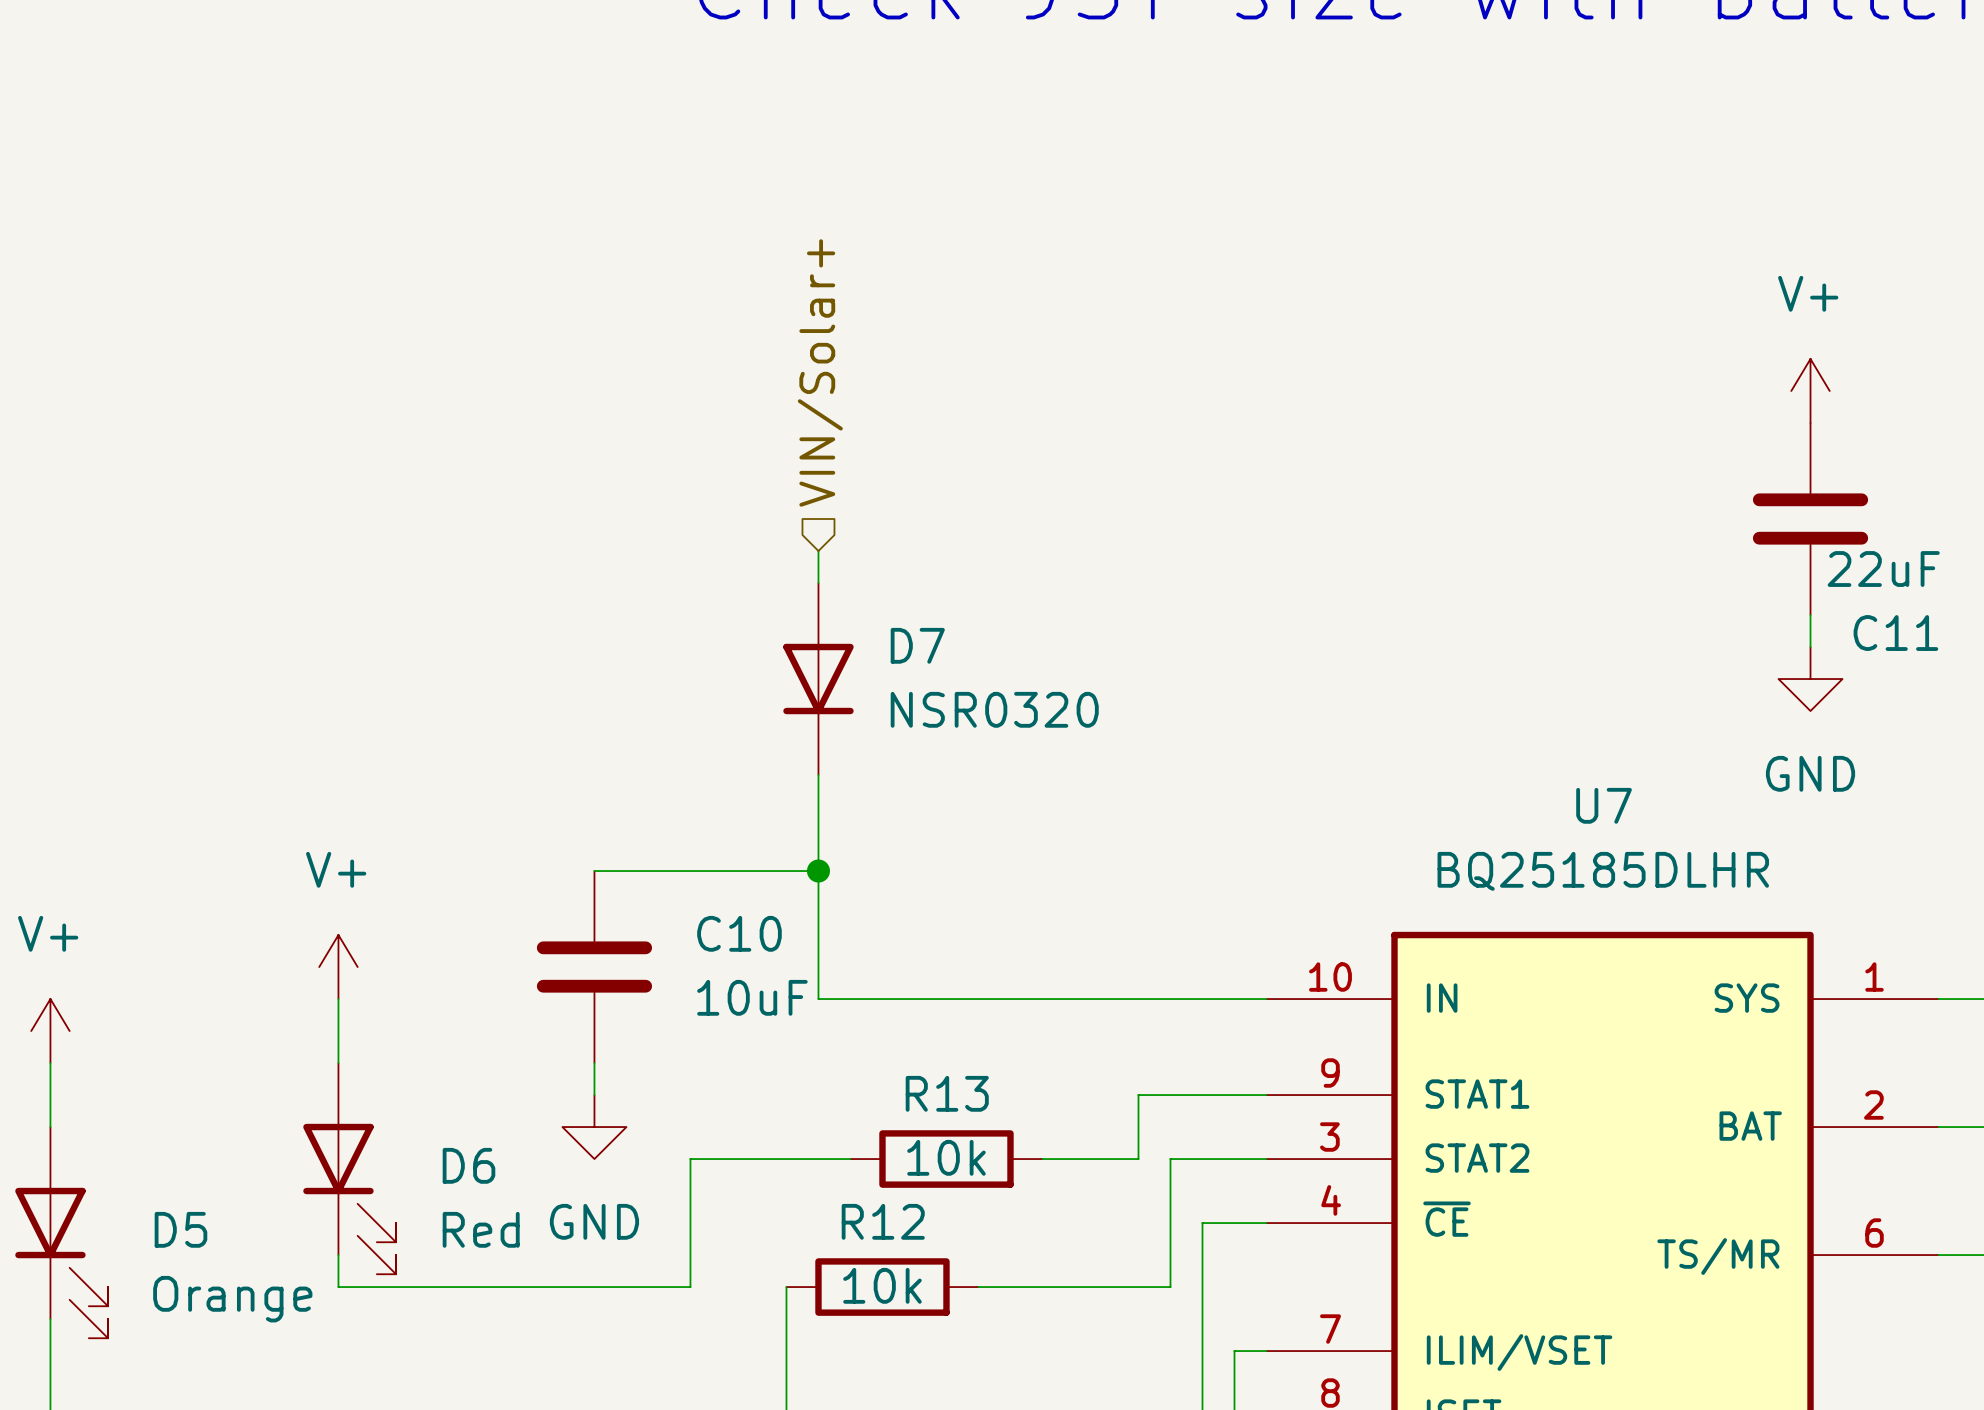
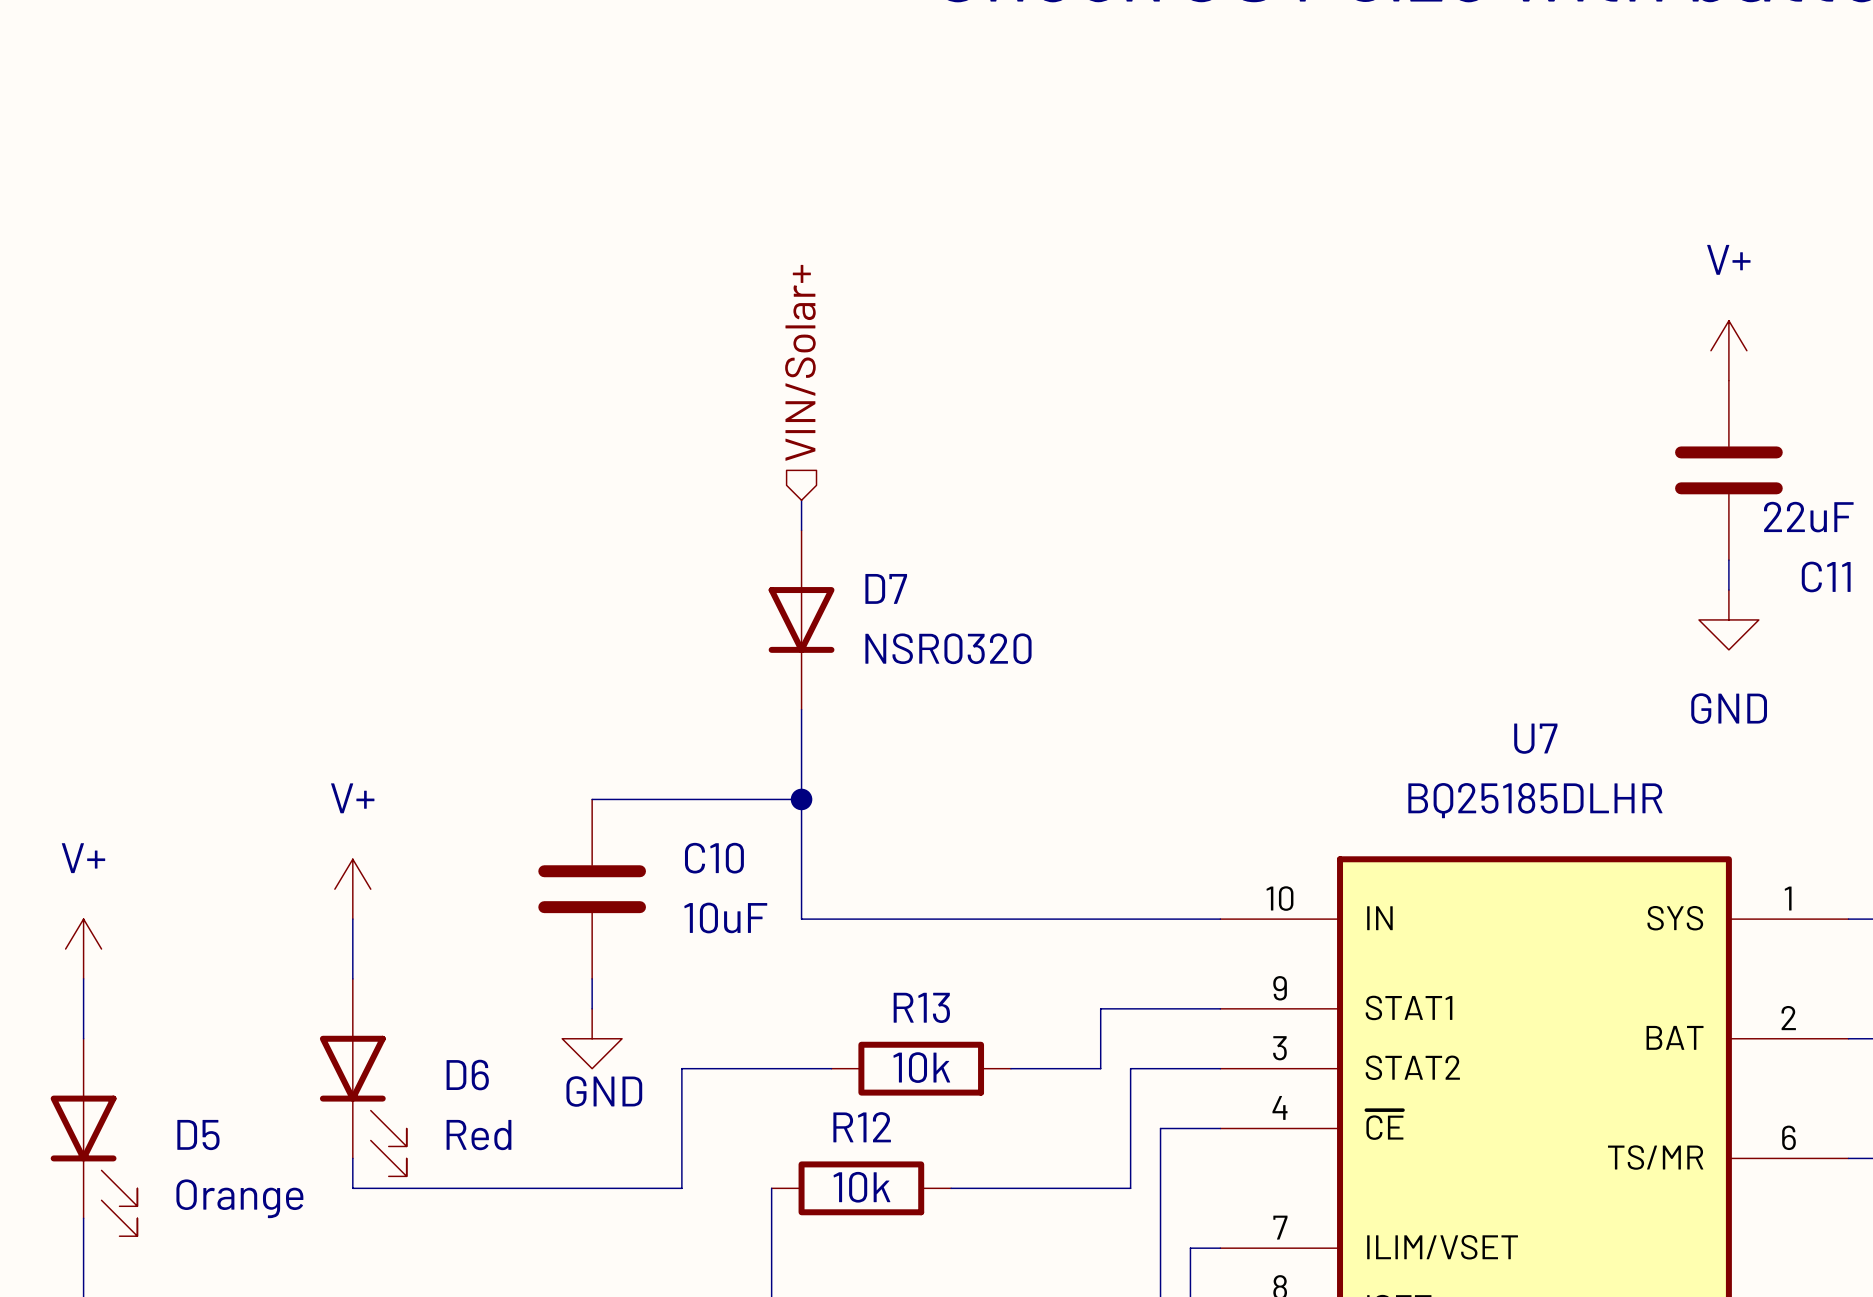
power symbol text position: GND (594, 1221) -> GND (604, 1091)

